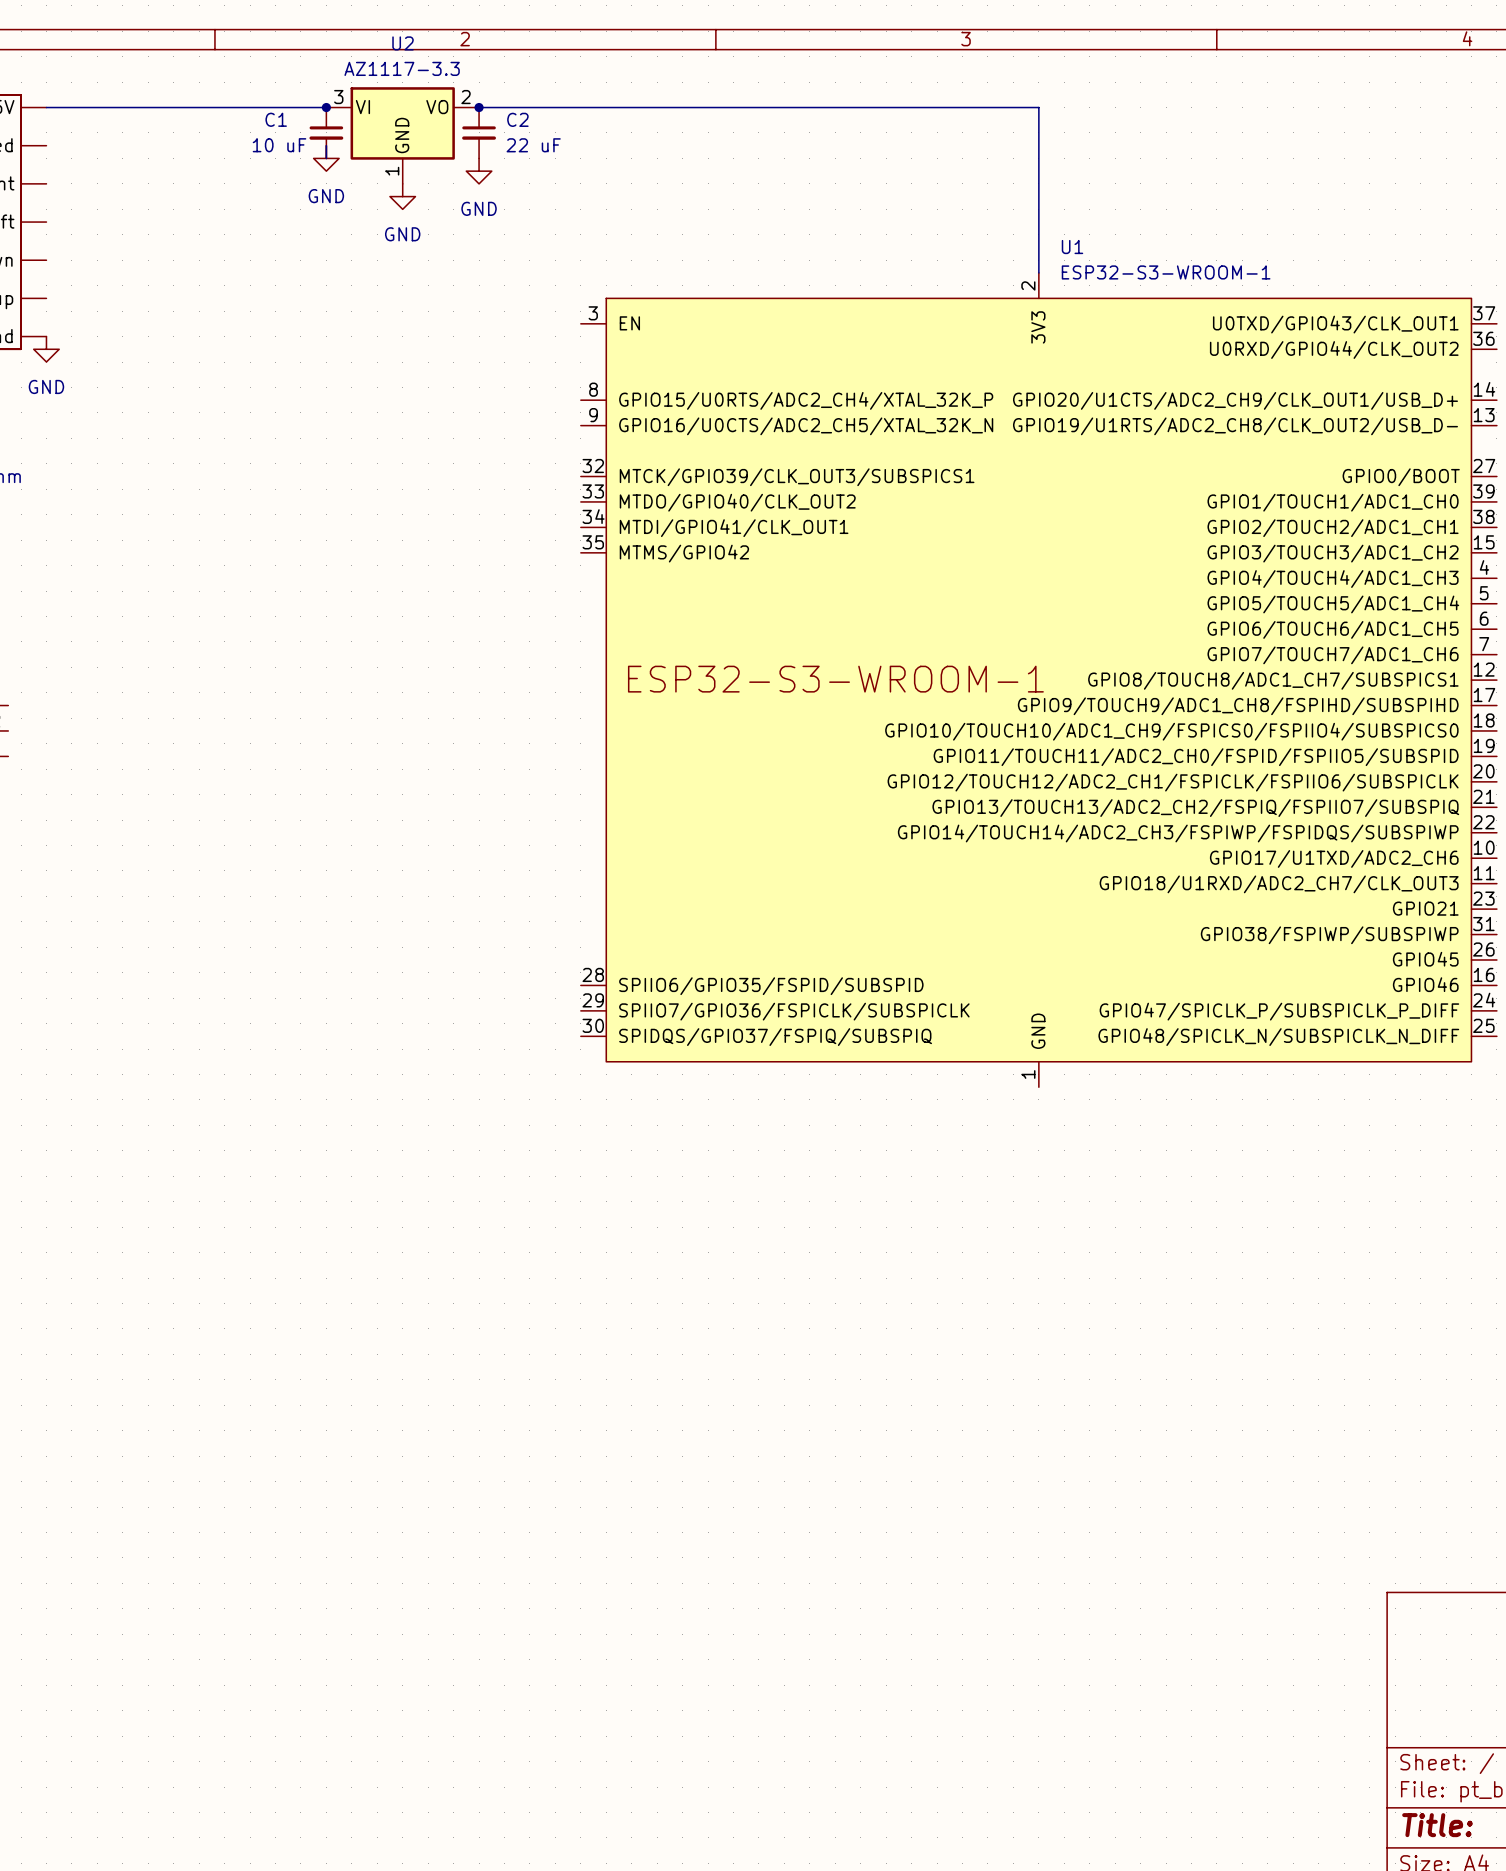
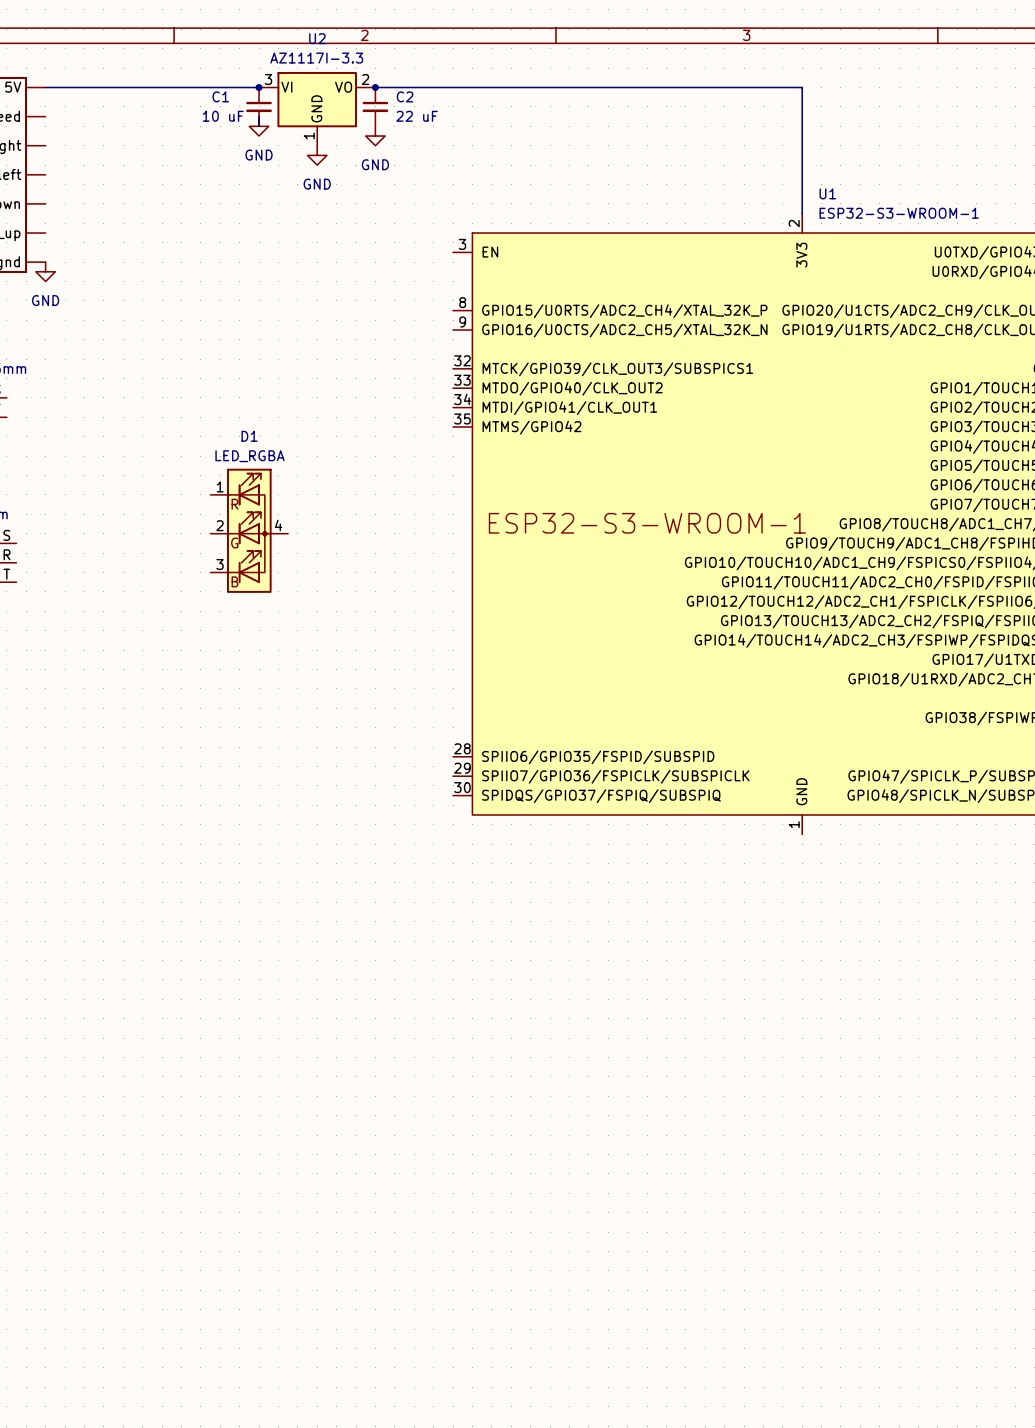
U2 value: AZ1117-3.3 (402, 68) -> AZ1117I-3.3 (316, 58)
D1: none -> LED_RGBA (249, 530)

